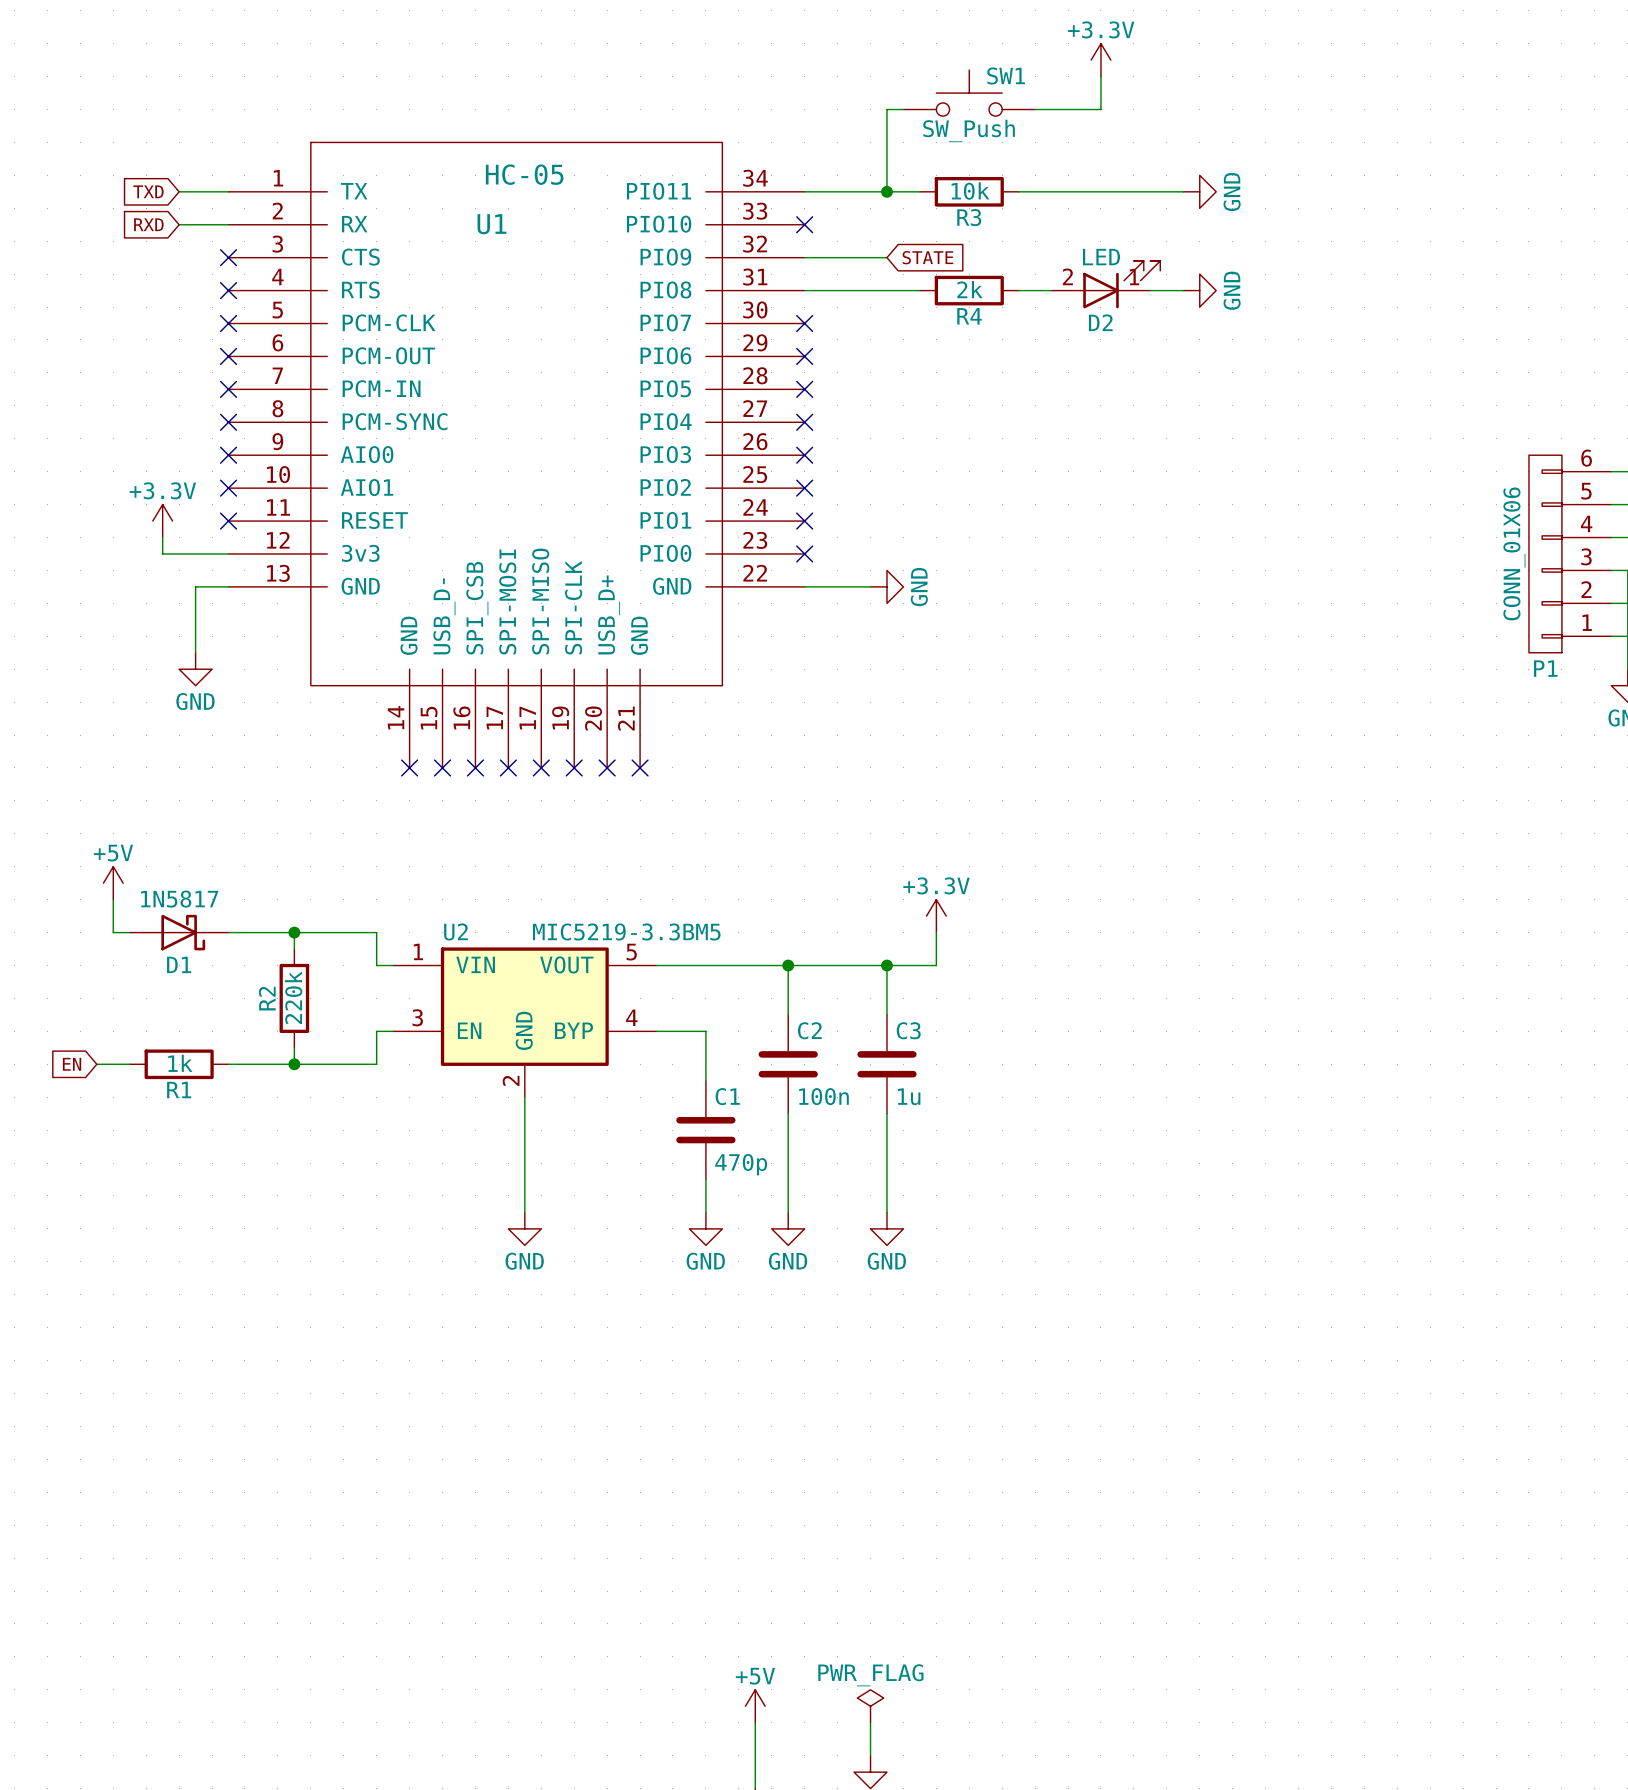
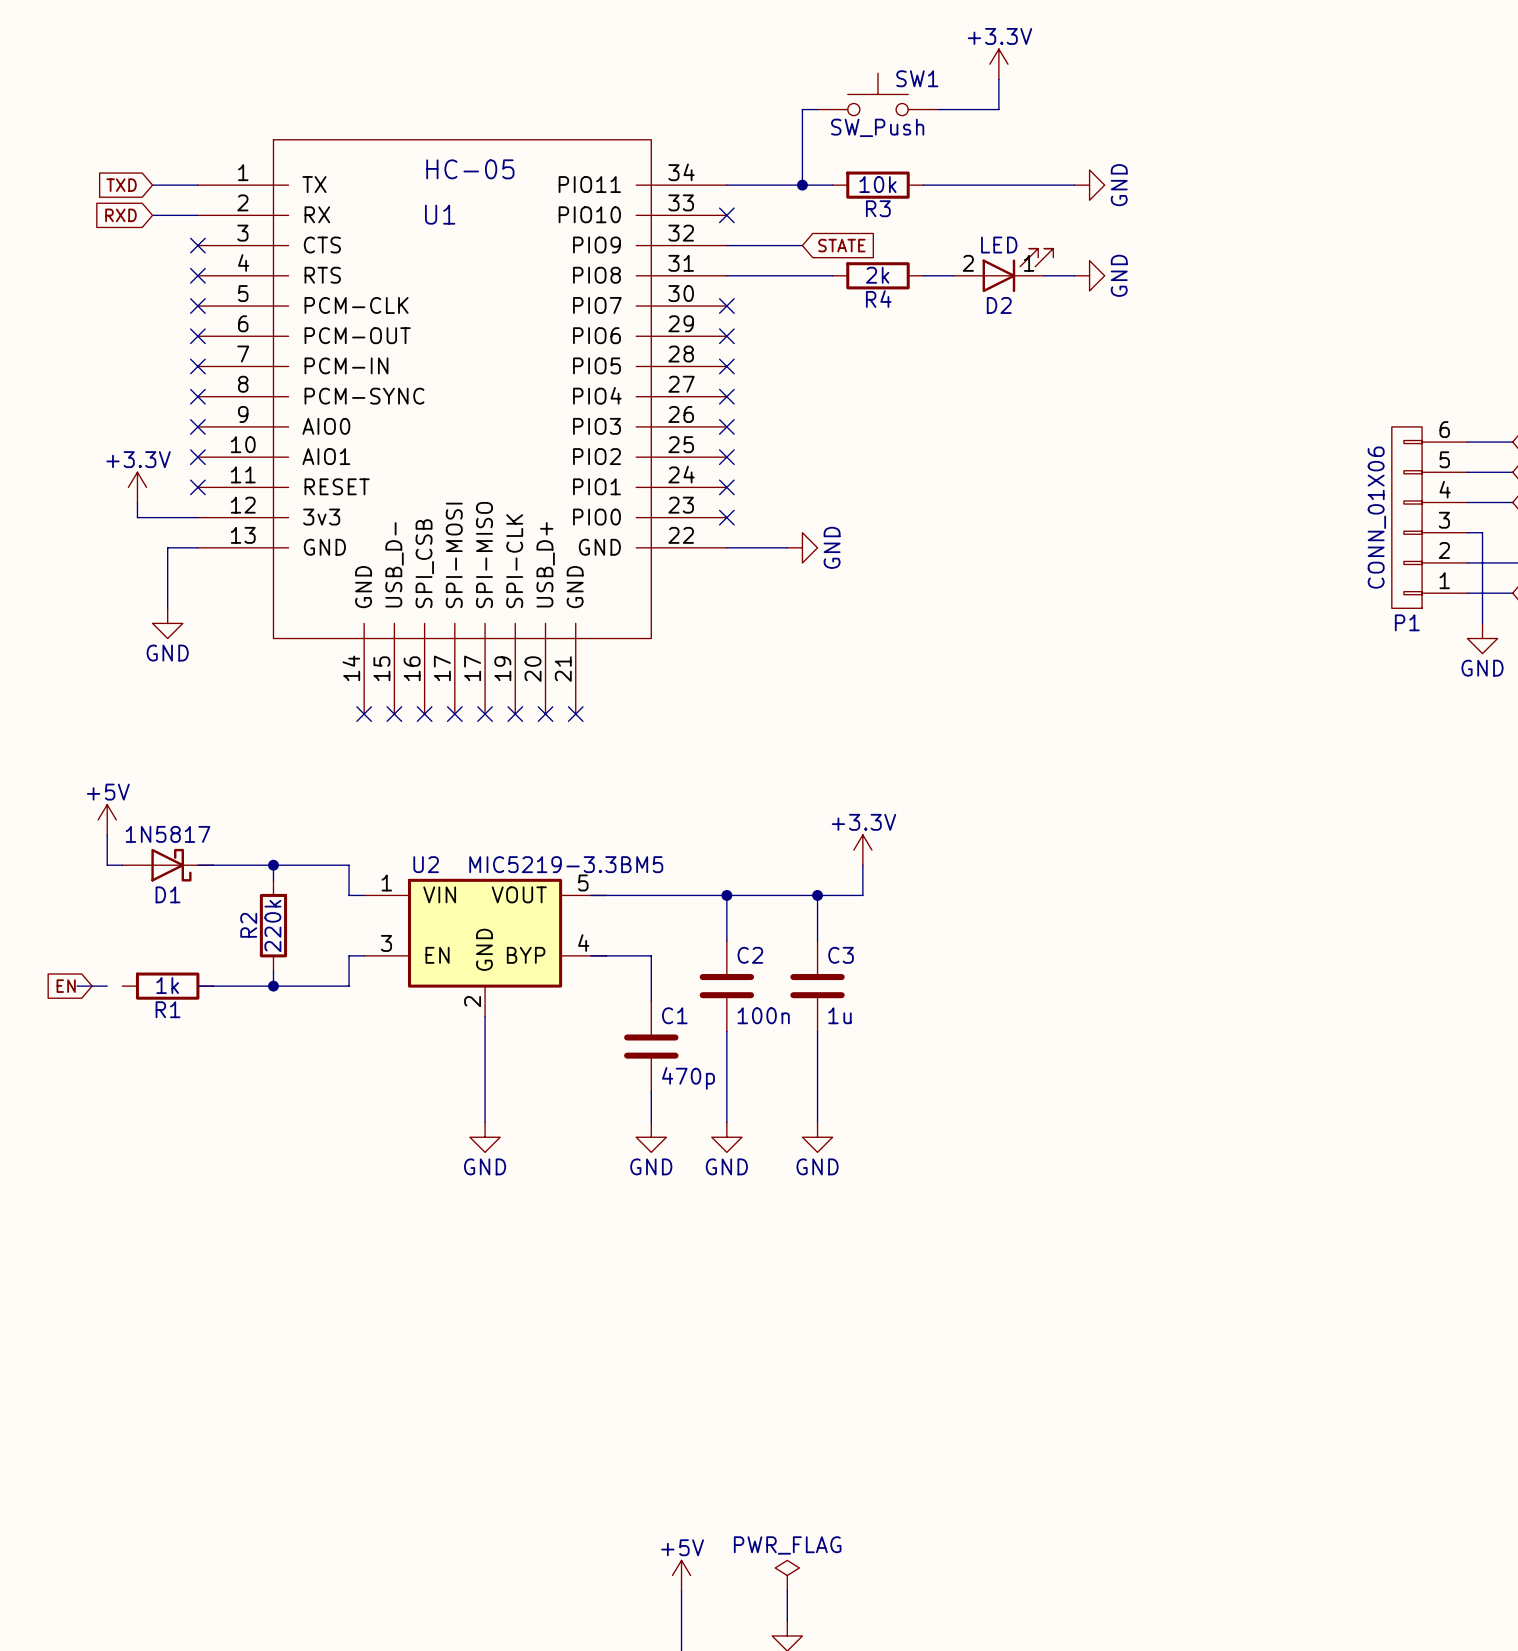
power symbol position: +5V (113, 883) -> +5V (107, 819)
wire: (113, 899) (113, 932) (129, 932) -> (107, 834) (107, 865) (122, 865)
power symbol position: +3.3V (936, 916) -> +3.3V (862, 850)
D1 position: (179, 932) -> (167, 865)
wire: (294, 932) (294, 949) -> (273, 865) (273, 880)
junction position: (294, 932) -> (273, 865)
wire: (376, 932) (376, 965) (393, 965) -> (333, 865) (349, 865) (349, 895) (364, 895)
wire: (936, 932) (936, 965) -> (862, 865) (862, 895) (847, 895)
wire: (788, 965) (788, 1014) -> (726, 895) (726, 940)
junction position: (788, 965) -> (726, 895)
wire: (886, 965) (886, 1014) -> (817, 895) (817, 940)
junction position: (886, 965) -> (817, 895)
R2 position: (294, 998) -> (273, 925)
U2 position: (524, 1022) -> (485, 947)
wire: (393, 1031) (376, 1031) (376, 1064) -> (364, 955) (349, 955) (349, 986) (333, 986)
wire: (705, 1031) (705, 1080) -> (636, 955) (651, 955) (651, 1001)
wire: (294, 1047) (294, 1064) -> (273, 971) (273, 986)
global label position: EN (72, 1064) -> EN (66, 986)
R1 position: (179, 1064) -> (167, 986)
junction position: (294, 1064) -> (273, 986)
C2 position: (788, 1064) -> (726, 986)
C3 position: (886, 1064) -> (817, 986)
wire: (524, 1097) (524, 1212) -> (485, 1016) (485, 1122)
wire: (788, 1113) (788, 1212) -> (726, 1031) (726, 1122)
wire: (886, 1113) (886, 1212) -> (817, 1031) (817, 1122)
C1 position: (705, 1130) -> (651, 1046)
wire: (705, 1179) (705, 1212) -> (651, 1091) (651, 1122)
power symbol position: GND (524, 1228) -> GND (485, 1137)
power symbol position: GND (705, 1228) -> GND (651, 1137)
power symbol position: GND (788, 1228) -> GND (726, 1137)
power symbol position: GND (886, 1228) -> GND (817, 1137)

